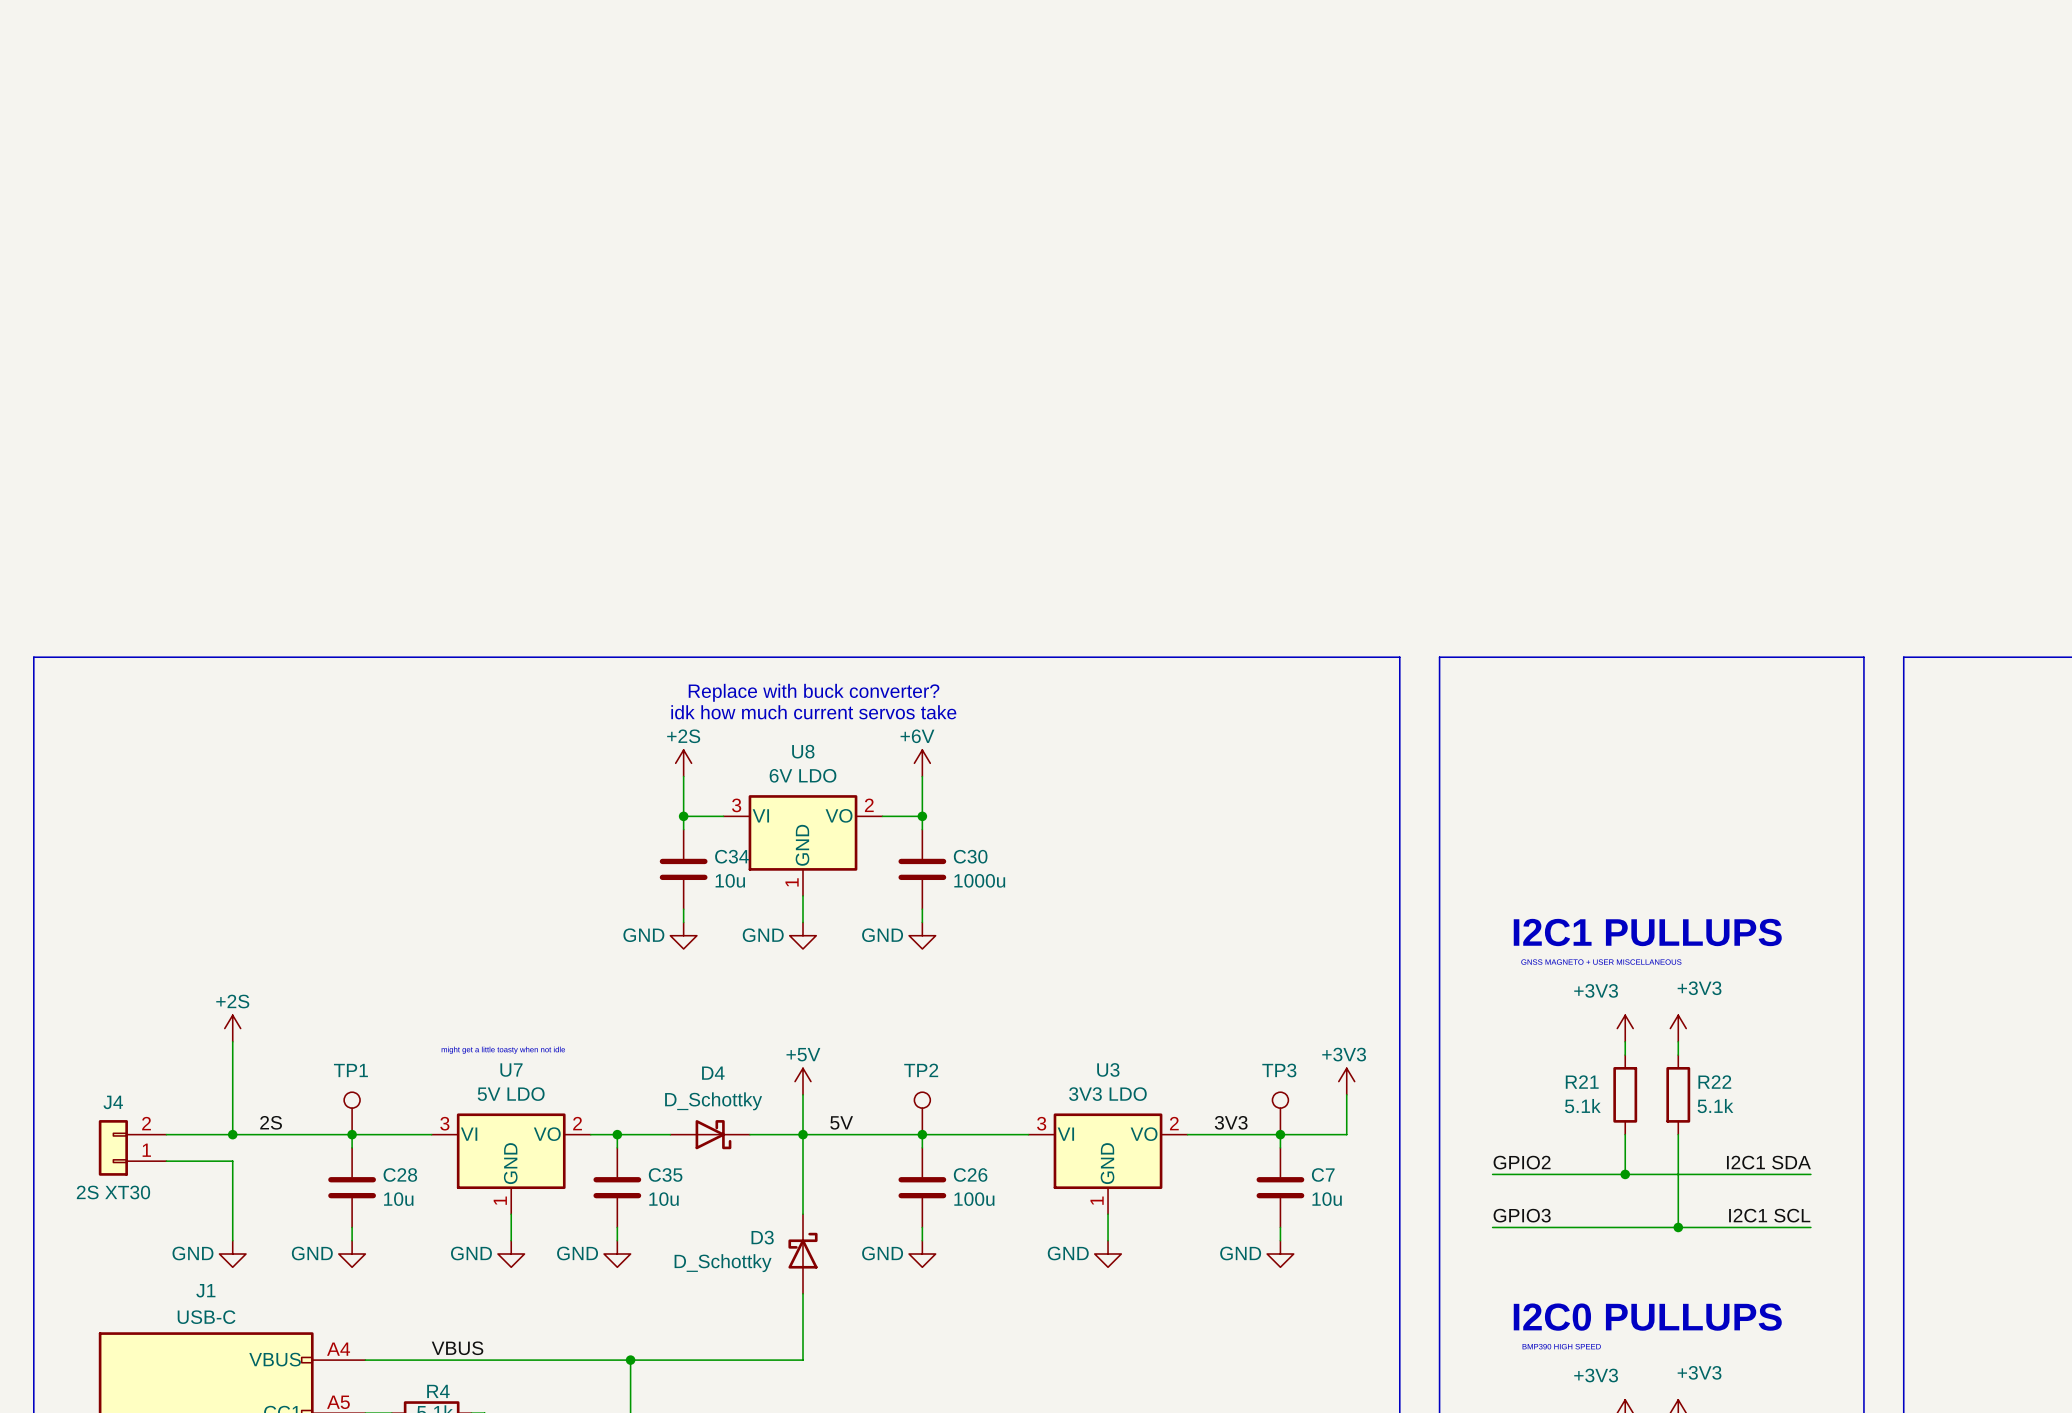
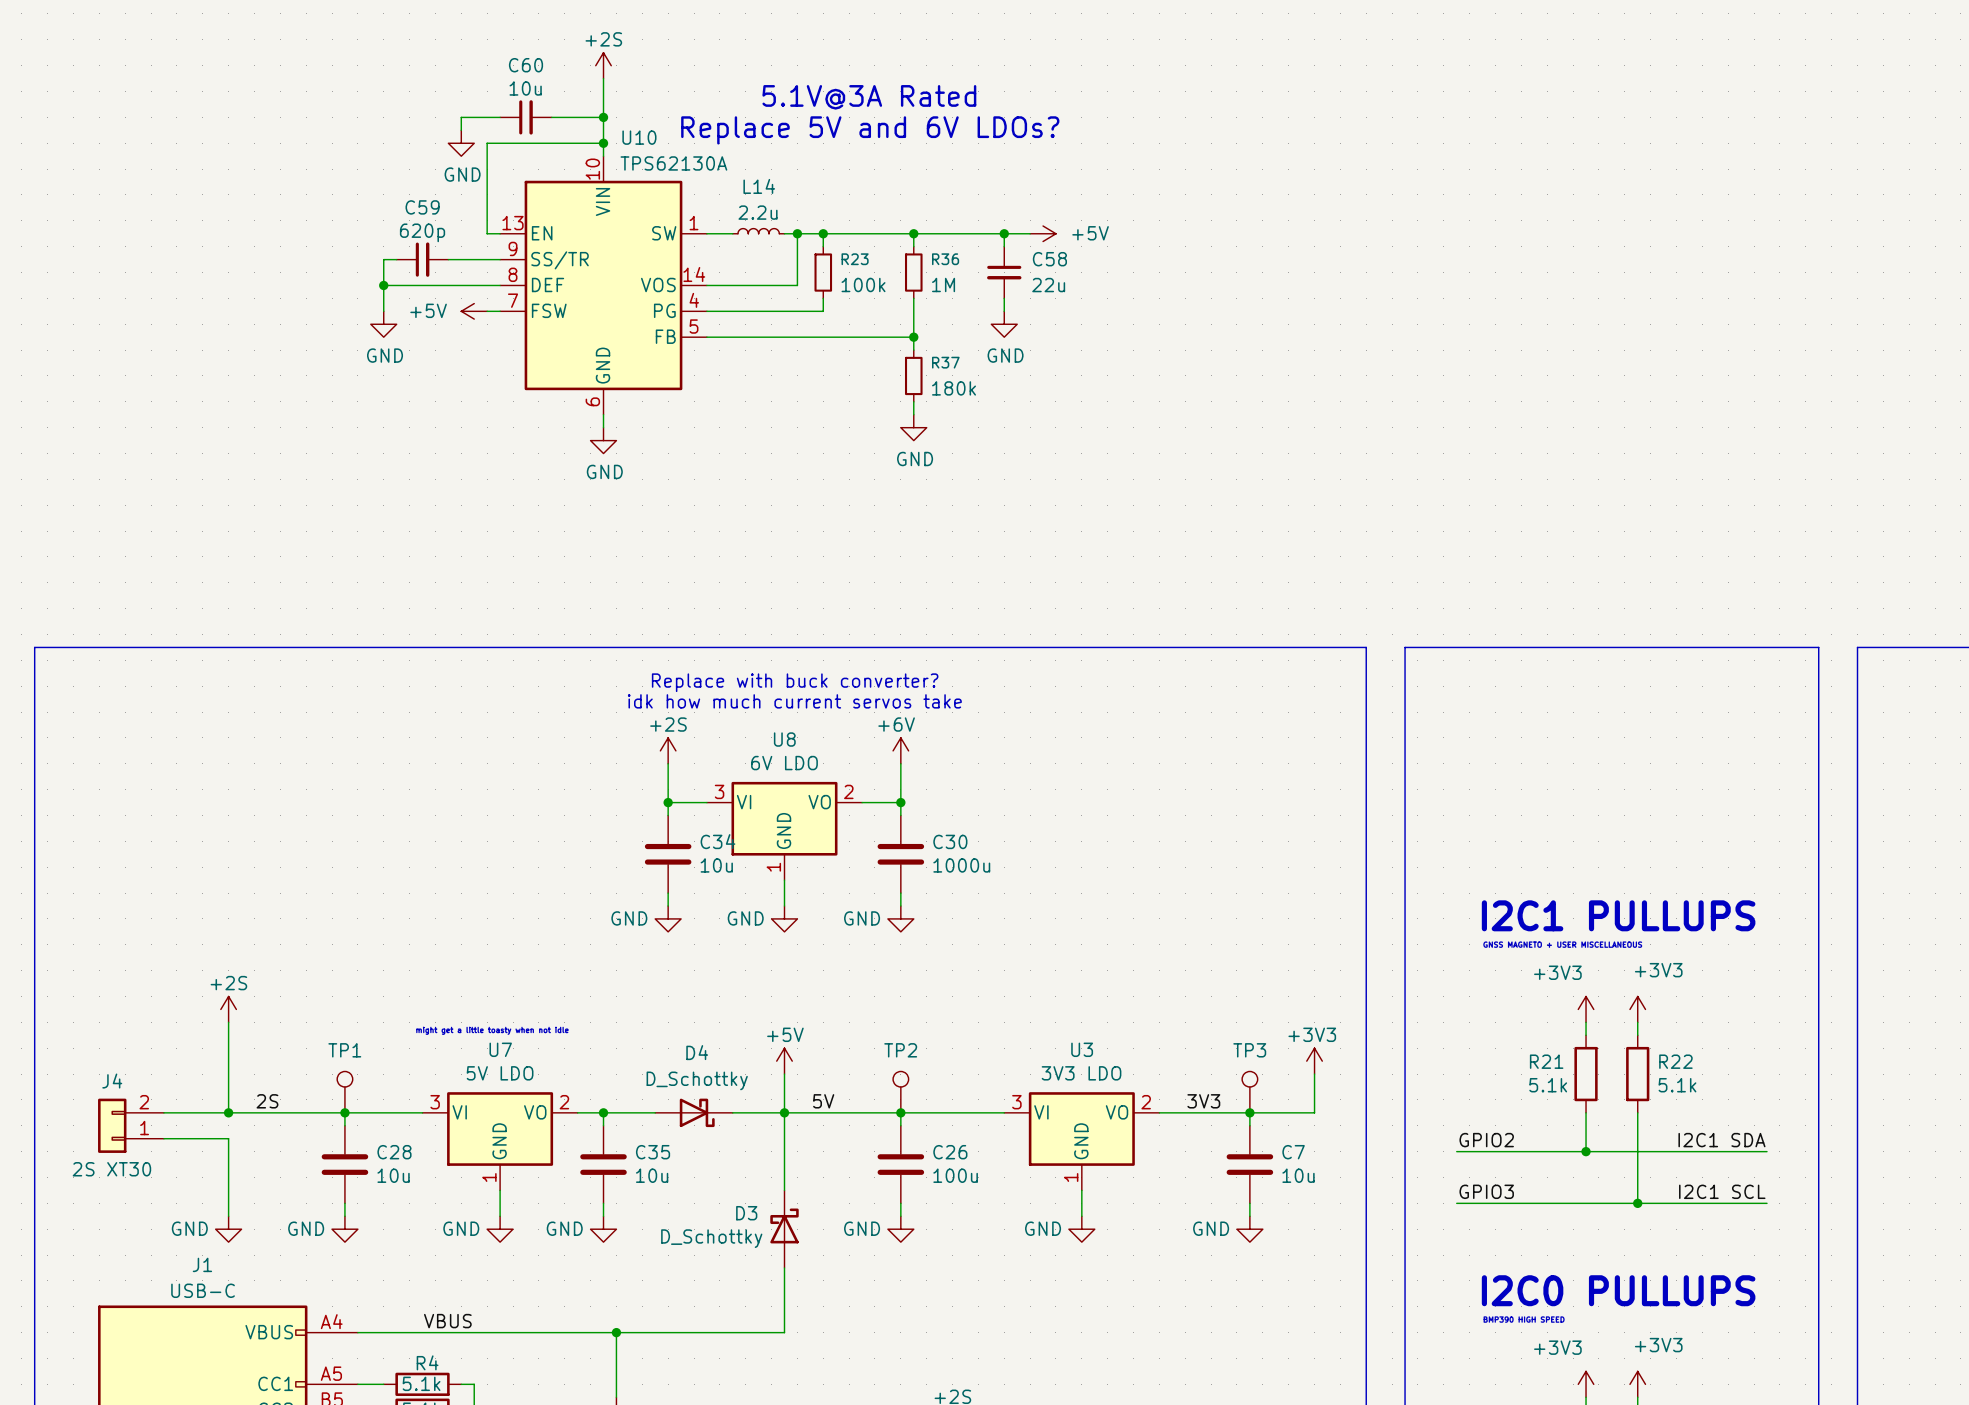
power symbol: none -> +2S (603, 65)
wire: none -> (603, 78) (603, 156)
text: none -> 5.1V@3A Rated (869, 97)
wire: none -> (500, 117) (461, 117) (461, 130)
C60: none -> 10u (525, 117)
wire: none -> (551, 117) (603, 117)
junction: none -> (603, 117)
text: none -> Replace 5V and 6V LDOs? (870, 130)
power symbol: none -> GND (461, 143)
wire: none -> (603, 143) (487, 143) (487, 233) (500, 233)
junction: none -> (603, 143)
L14: none -> 2.2u (758, 231)
wire: none -> (706, 233) (732, 233)
wire: none -> (784, 233) (1030, 233)
wire: none -> (797, 233) (797, 285) (706, 285)
junction: none -> (797, 233)
wire: none -> (823, 233) (823, 246)
junction: none -> (823, 233)
wire: none -> (913, 233) (913, 246)
junction: none -> (913, 233)
wire: none -> (1004, 233) (1004, 246)
junction: none -> (1004, 233)
power symbol: none -> +5V (1043, 233)
wire: none -> (396, 259) (383, 259) (383, 311)
C59: none -> 620p (422, 259)
wire: none -> (448, 259) (500, 259)
R23: none -> 100k (823, 272)
R36: none -> 1M (913, 272)
C58: none -> 22u (1004, 272)
wire: none -> (383, 285) (500, 285)
junction: none -> (383, 285)
U10: none -> TPS62130A (603, 285)
wire: none -> (823, 298) (823, 311) (706, 311)
wire: none -> (913, 298) (913, 350)
wire: none -> (1004, 298) (1004, 311)
power symbol: none -> +5V (474, 311)
wire: none -> (487, 311) (500, 311)
power symbol: none -> GND (383, 324)
power symbol: none -> GND (1004, 324)
wire: none -> (706, 337) (913, 337)
junction: none -> (913, 337)
R37: none -> 180k (913, 375)
wire: none -> (913, 401) (913, 414)
wire: none -> (603, 414) (603, 427)
power symbol: none -> GND (913, 427)
power symbol: none -> GND (603, 440)

